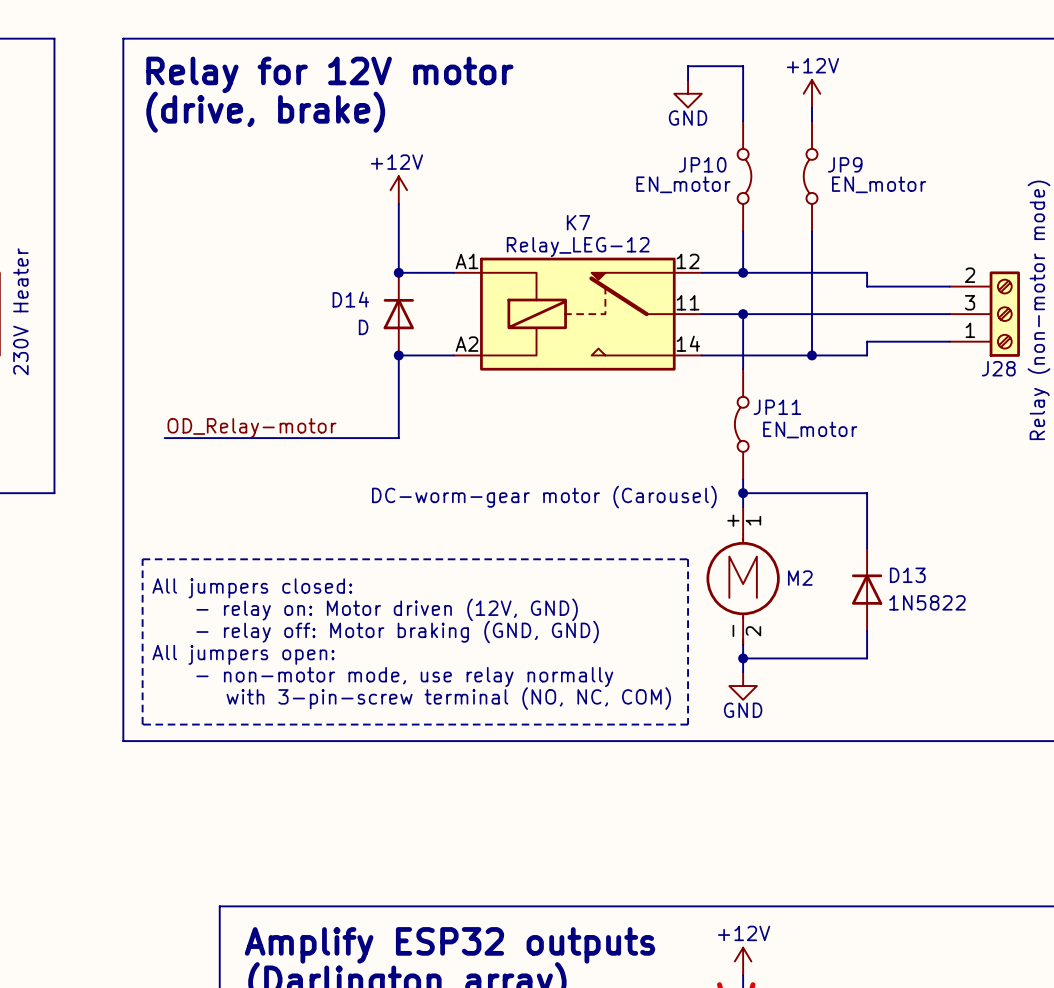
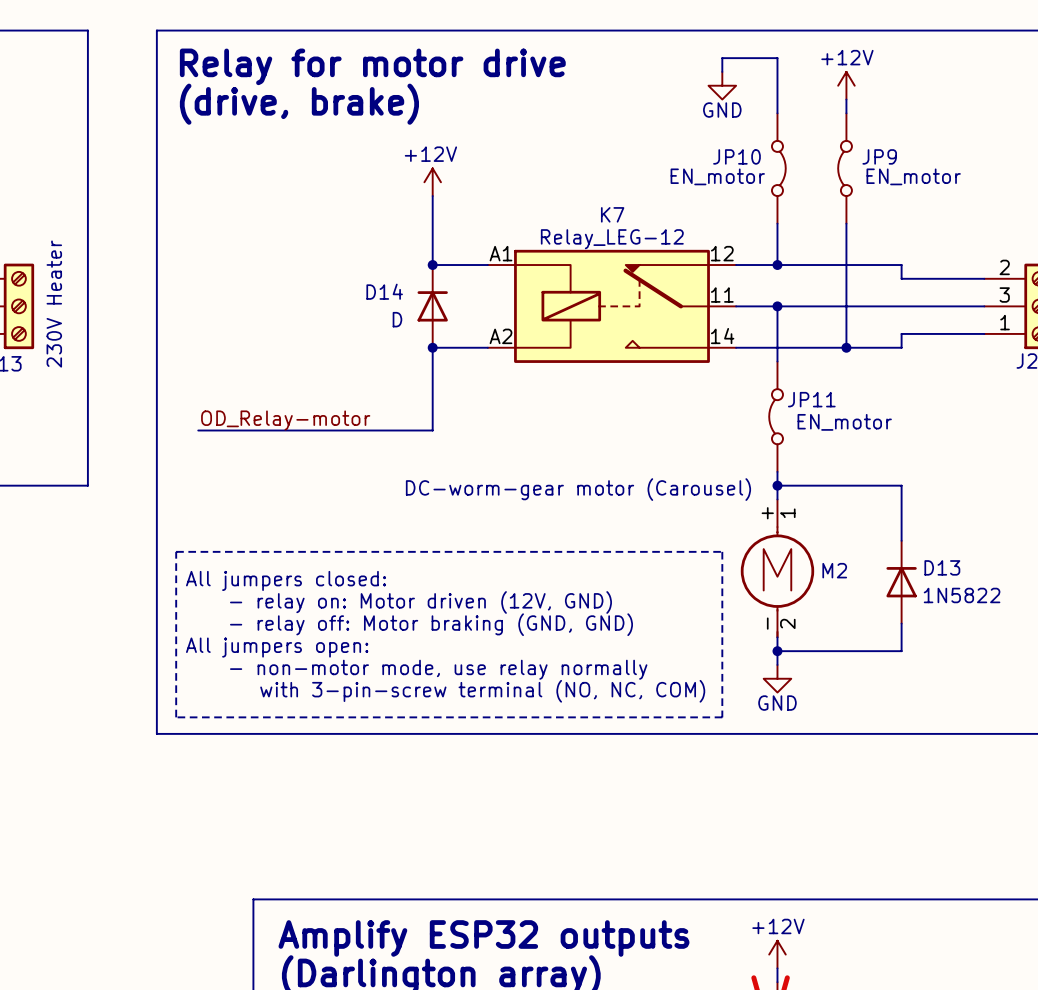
text: Relay for 12V motor (329, 74) -> Relay for motor drive (372, 66)

